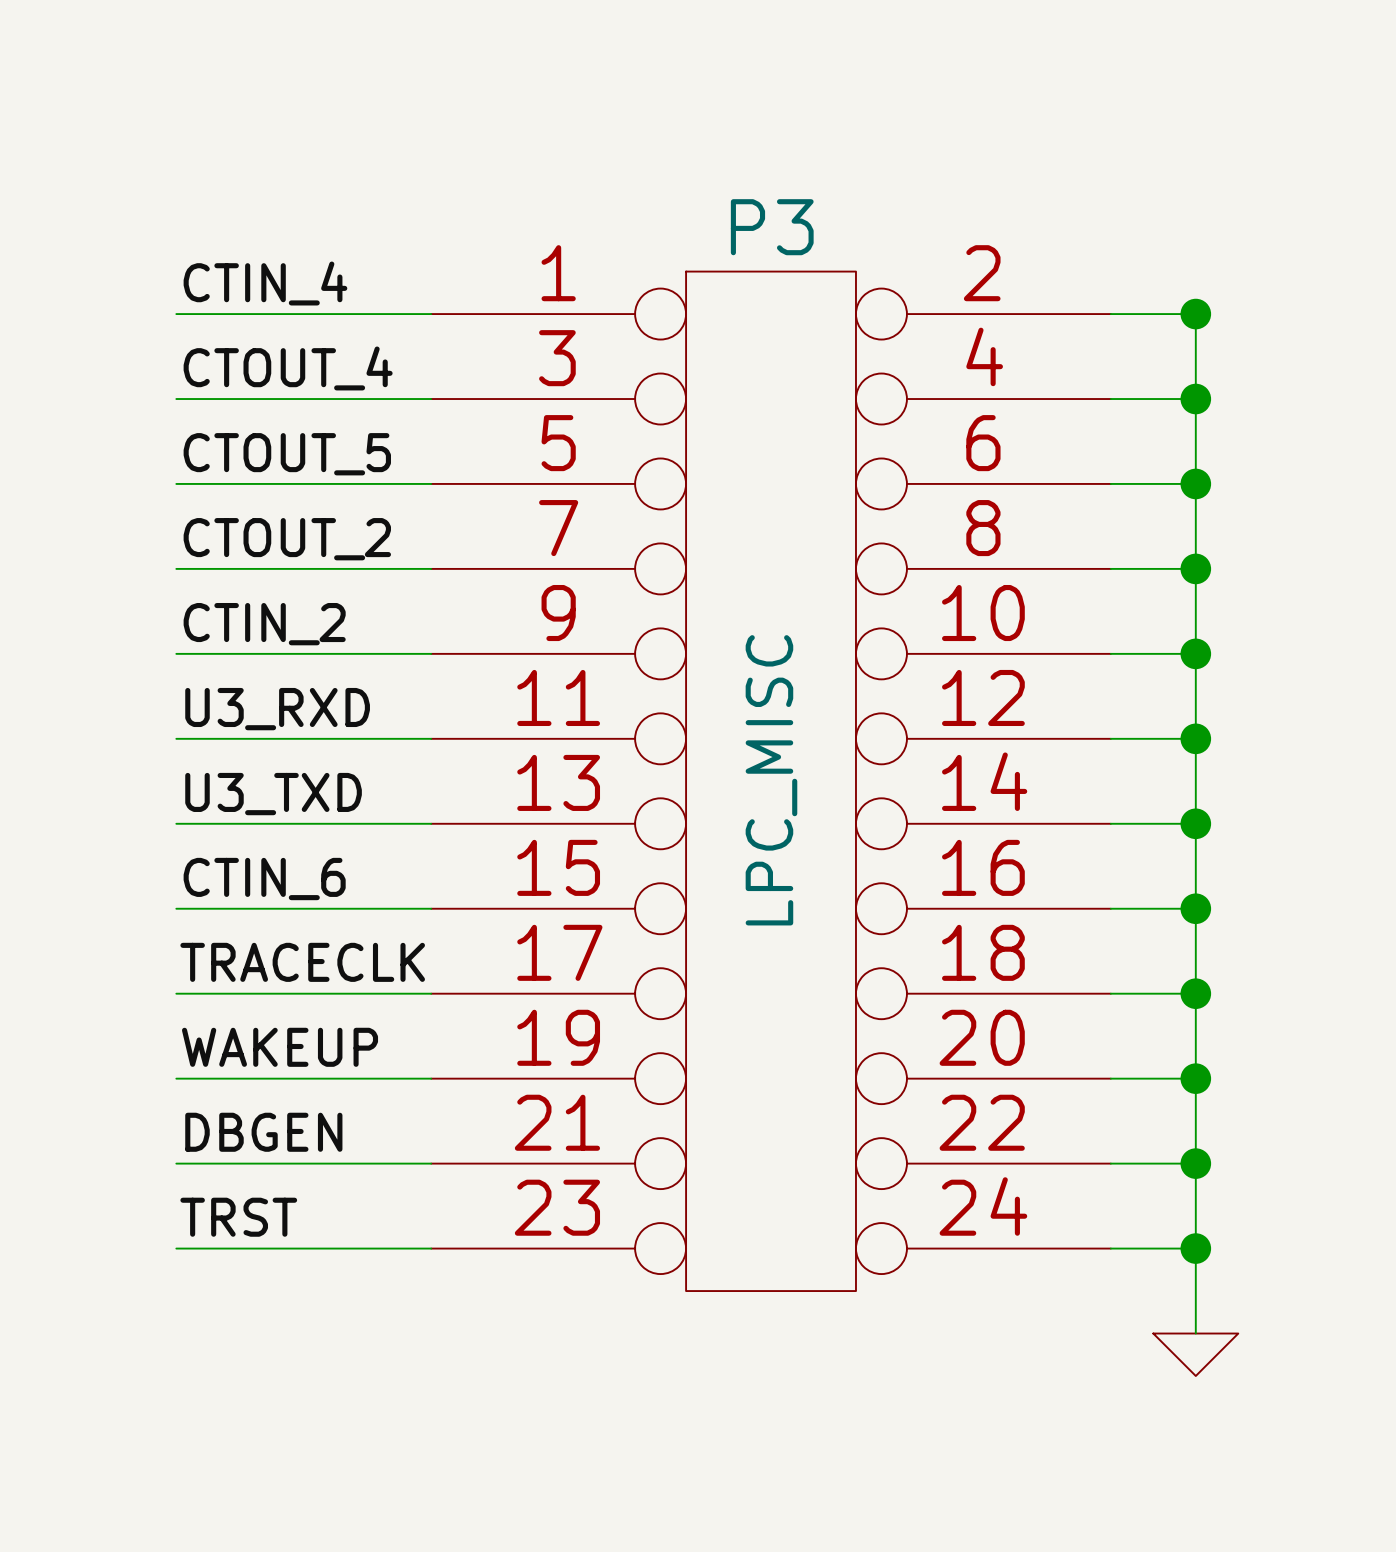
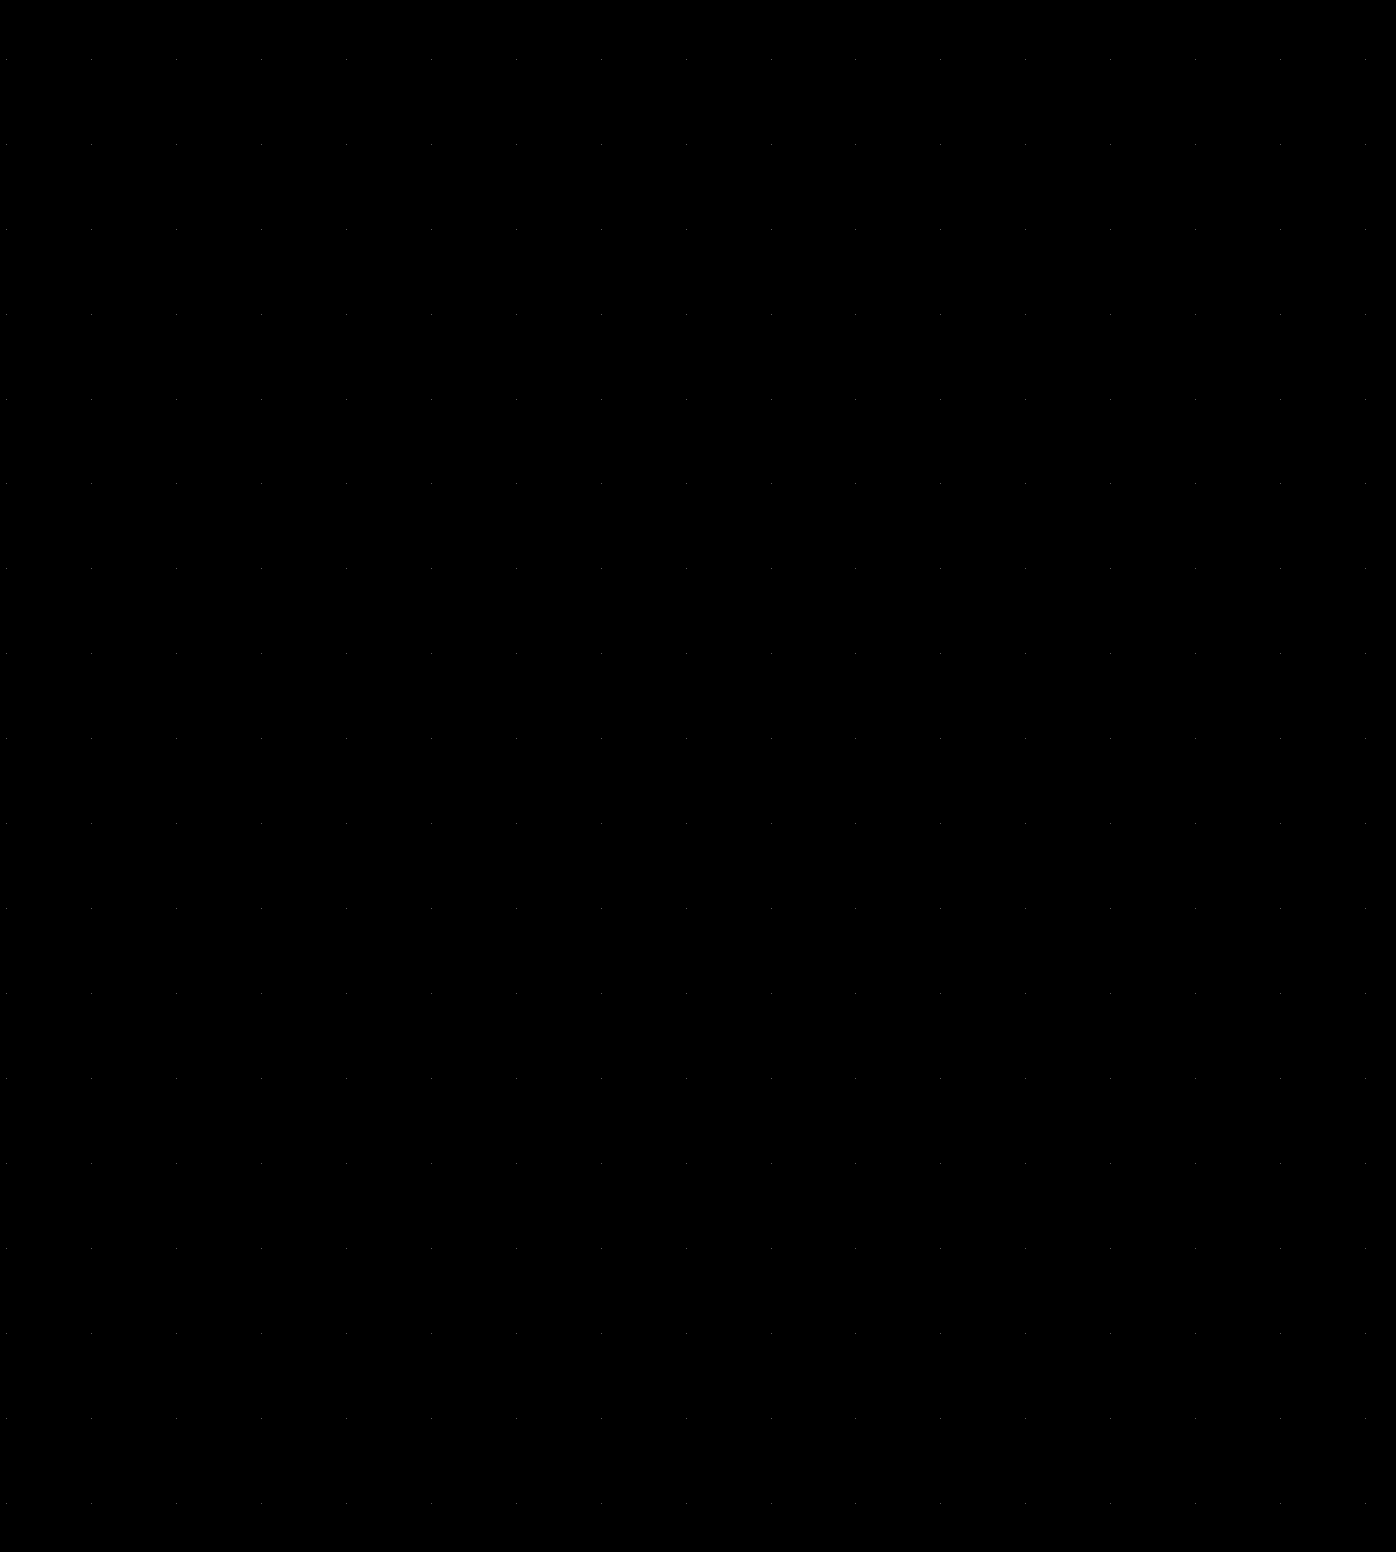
label: CTIN_4 (265, 283) -> none
wire: (176, 314) (431, 314) -> none
wire: (1110, 314) (1195, 314) (1195, 1333) -> none
junction: (1195, 314) -> none
label: CTOUT_4 (288, 368) -> none
wire: (176, 399) (431, 399) -> none
wire: (1110, 399) (1195, 399) -> none
junction: (1195, 399) -> none
label: CTOUT_5 (287, 454) -> none
wire: (176, 483) (431, 483) -> none
wire: (1110, 483) (1195, 483) -> none
junction: (1195, 483) -> none
label: CTOUT_2 (287, 539) -> none
wire: (176, 568) (431, 568) -> none
wire: (1110, 568) (1195, 568) -> none
junction: (1195, 568) -> none
label: CTIN_2 (264, 624) -> none
wire: (176, 653) (431, 653) -> none
wire: (1110, 653) (1195, 653) -> none
junction: (1195, 653) -> none
label: U3_RXD (277, 709) -> none
wire: (176, 738) (431, 738) -> none
wire: (1110, 738) (1195, 738) -> none
junction: (1195, 738) -> none
P3: LPC_MISC (771, 781) -> none
label: U3_TXD (273, 794) -> none
wire: (176, 823) (431, 823) -> none
wire: (1110, 823) (1195, 823) -> none
junction: (1195, 823) -> none
label: CTIN_6 (264, 879) -> none
wire: (176, 908) (431, 908) -> none
wire: (1110, 908) (1195, 908) -> none
junction: (1195, 908) -> none
label: TRACECLK (302, 962) -> none
wire: (176, 993) (431, 993) -> none
wire: (1110, 993) (1195, 993) -> none
junction: (1195, 993) -> none
label: WAKEUP (280, 1047) -> none
wire: (176, 1078) (431, 1078) -> none
wire: (1110, 1078) (1195, 1078) -> none
junction: (1195, 1078) -> none
label: DBGEN (263, 1132) -> none
wire: (176, 1163) (431, 1163) -> none
wire: (1110, 1163) (1195, 1163) -> none
junction: (1195, 1163) -> none
label: TRST (238, 1217) -> none
wire: (176, 1248) (431, 1248) -> none
wire: (1110, 1248) (1195, 1248) -> none
junction: (1195, 1248) -> none
power symbol: (1195, 1354) -> none

